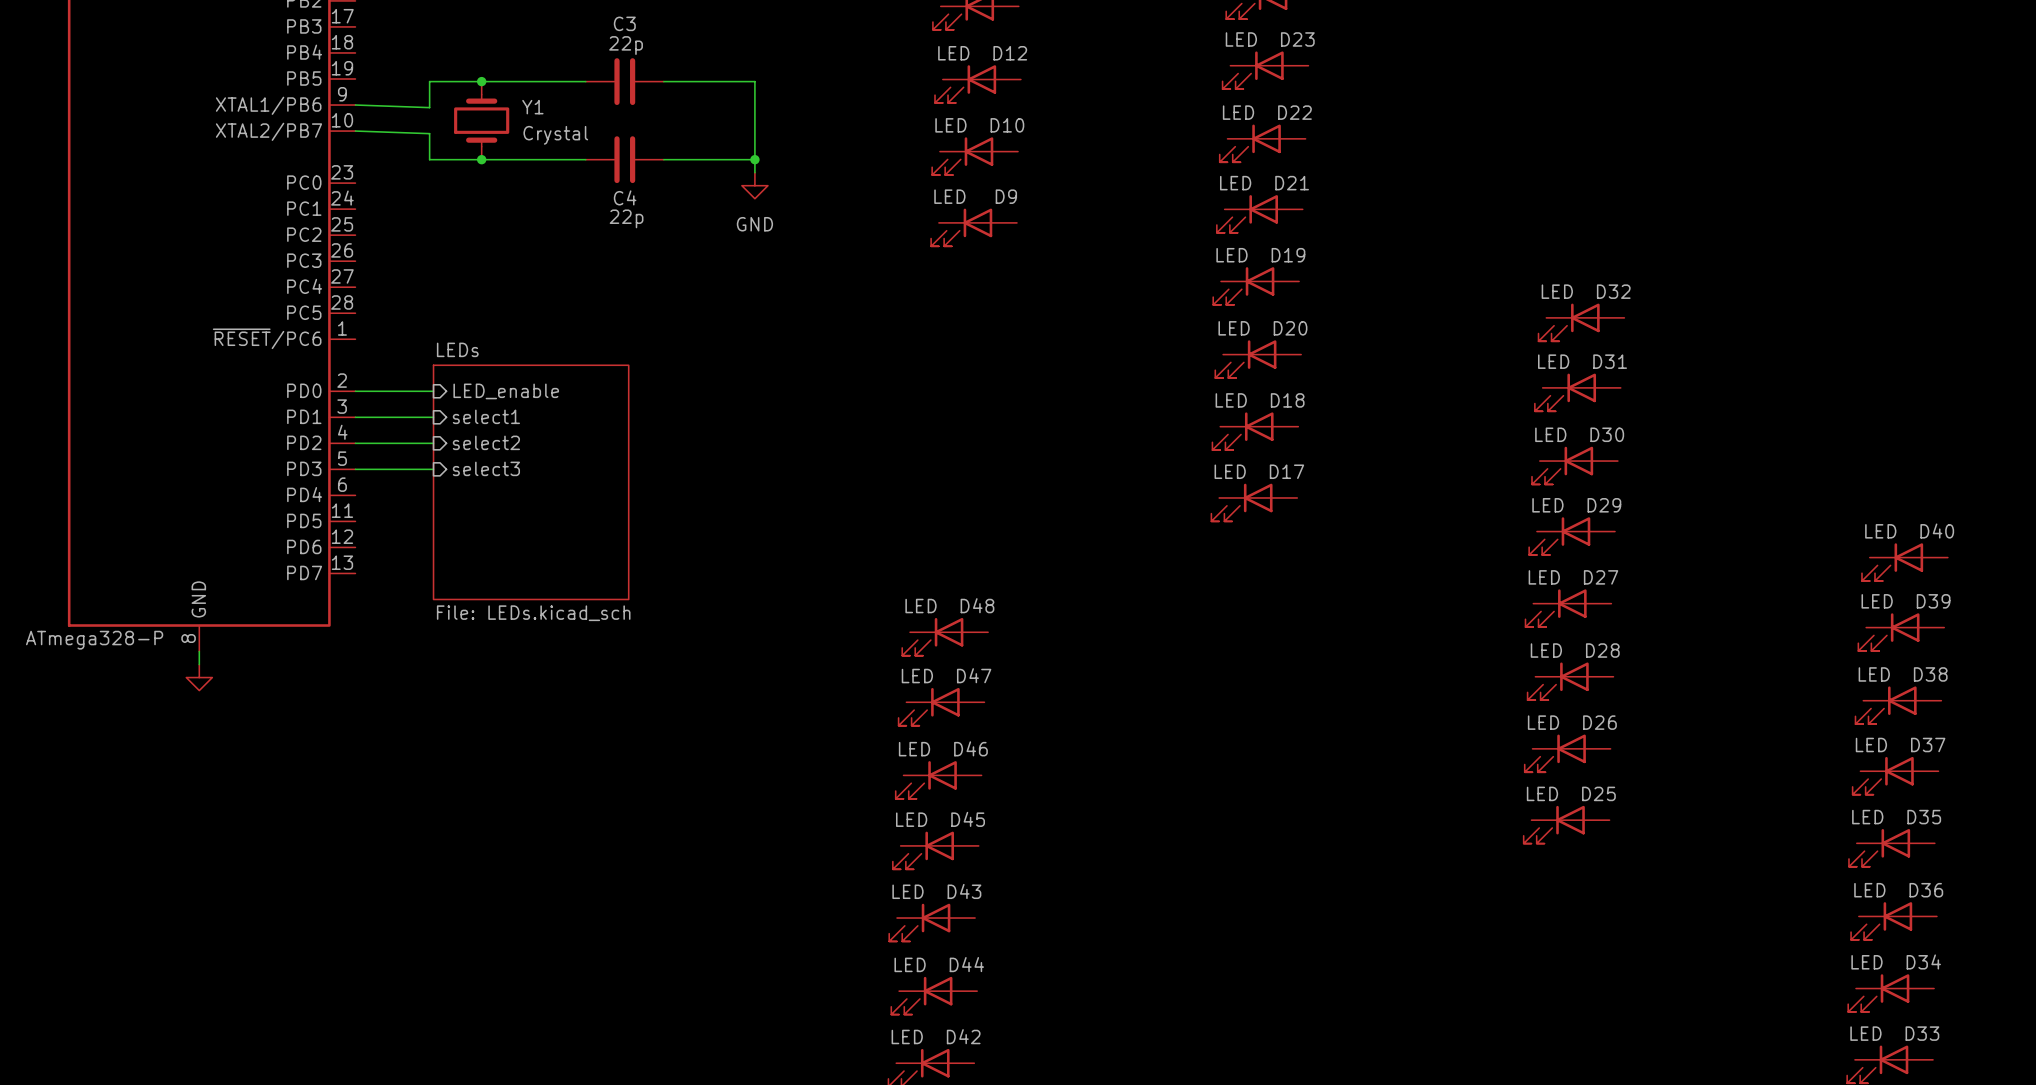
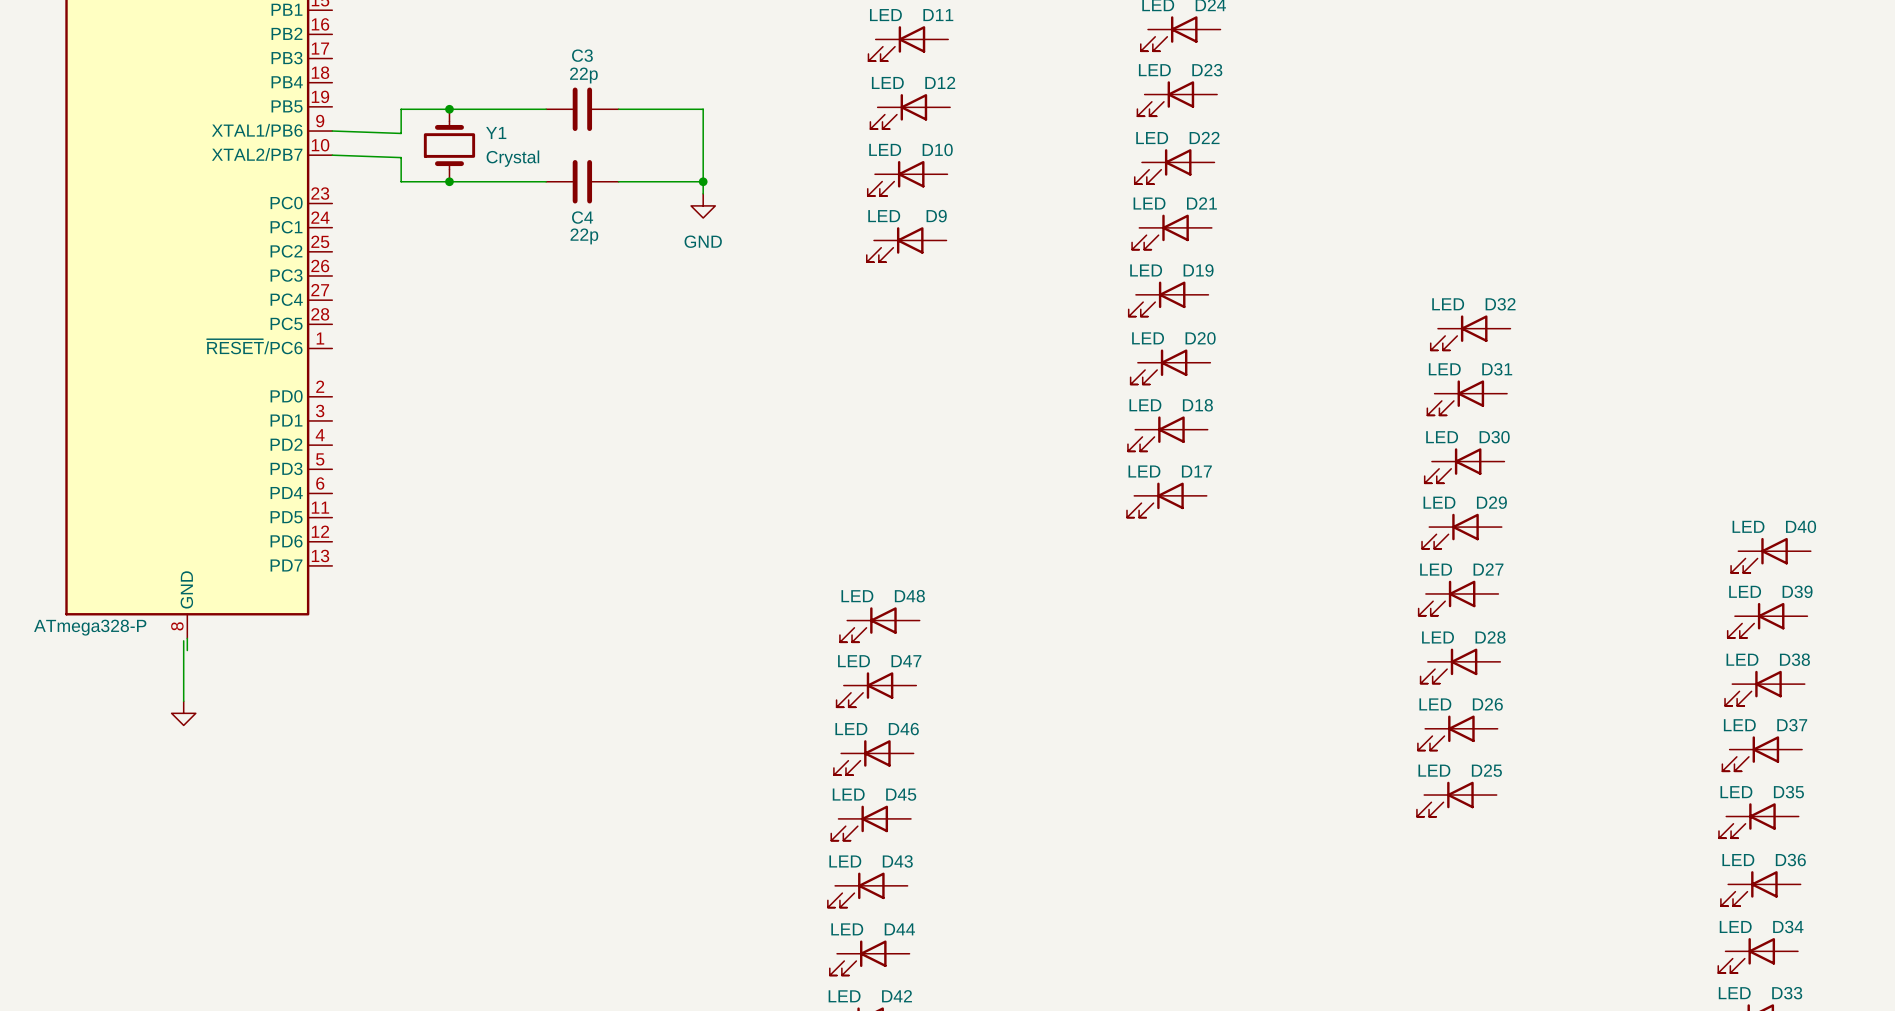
wire: (355, 391) (433, 391) -> none
sheet pin: LED_enable (506, 391) -> none
sheet pin: select1 (486, 416) -> none
wire: (355, 417) (433, 417) -> none
sheet pin: select2 (486, 442) -> none
wire: (355, 443) (433, 443) -> none
sheet pin: select3 (486, 468) -> none
wire: (355, 469) (433, 469) -> none
sheet LEDs: File: LEDs.kicad_sch (531, 482) -> none
wire: none -> (183, 640) (183, 701)
power symbol position: (199, 677) -> (183, 713)

